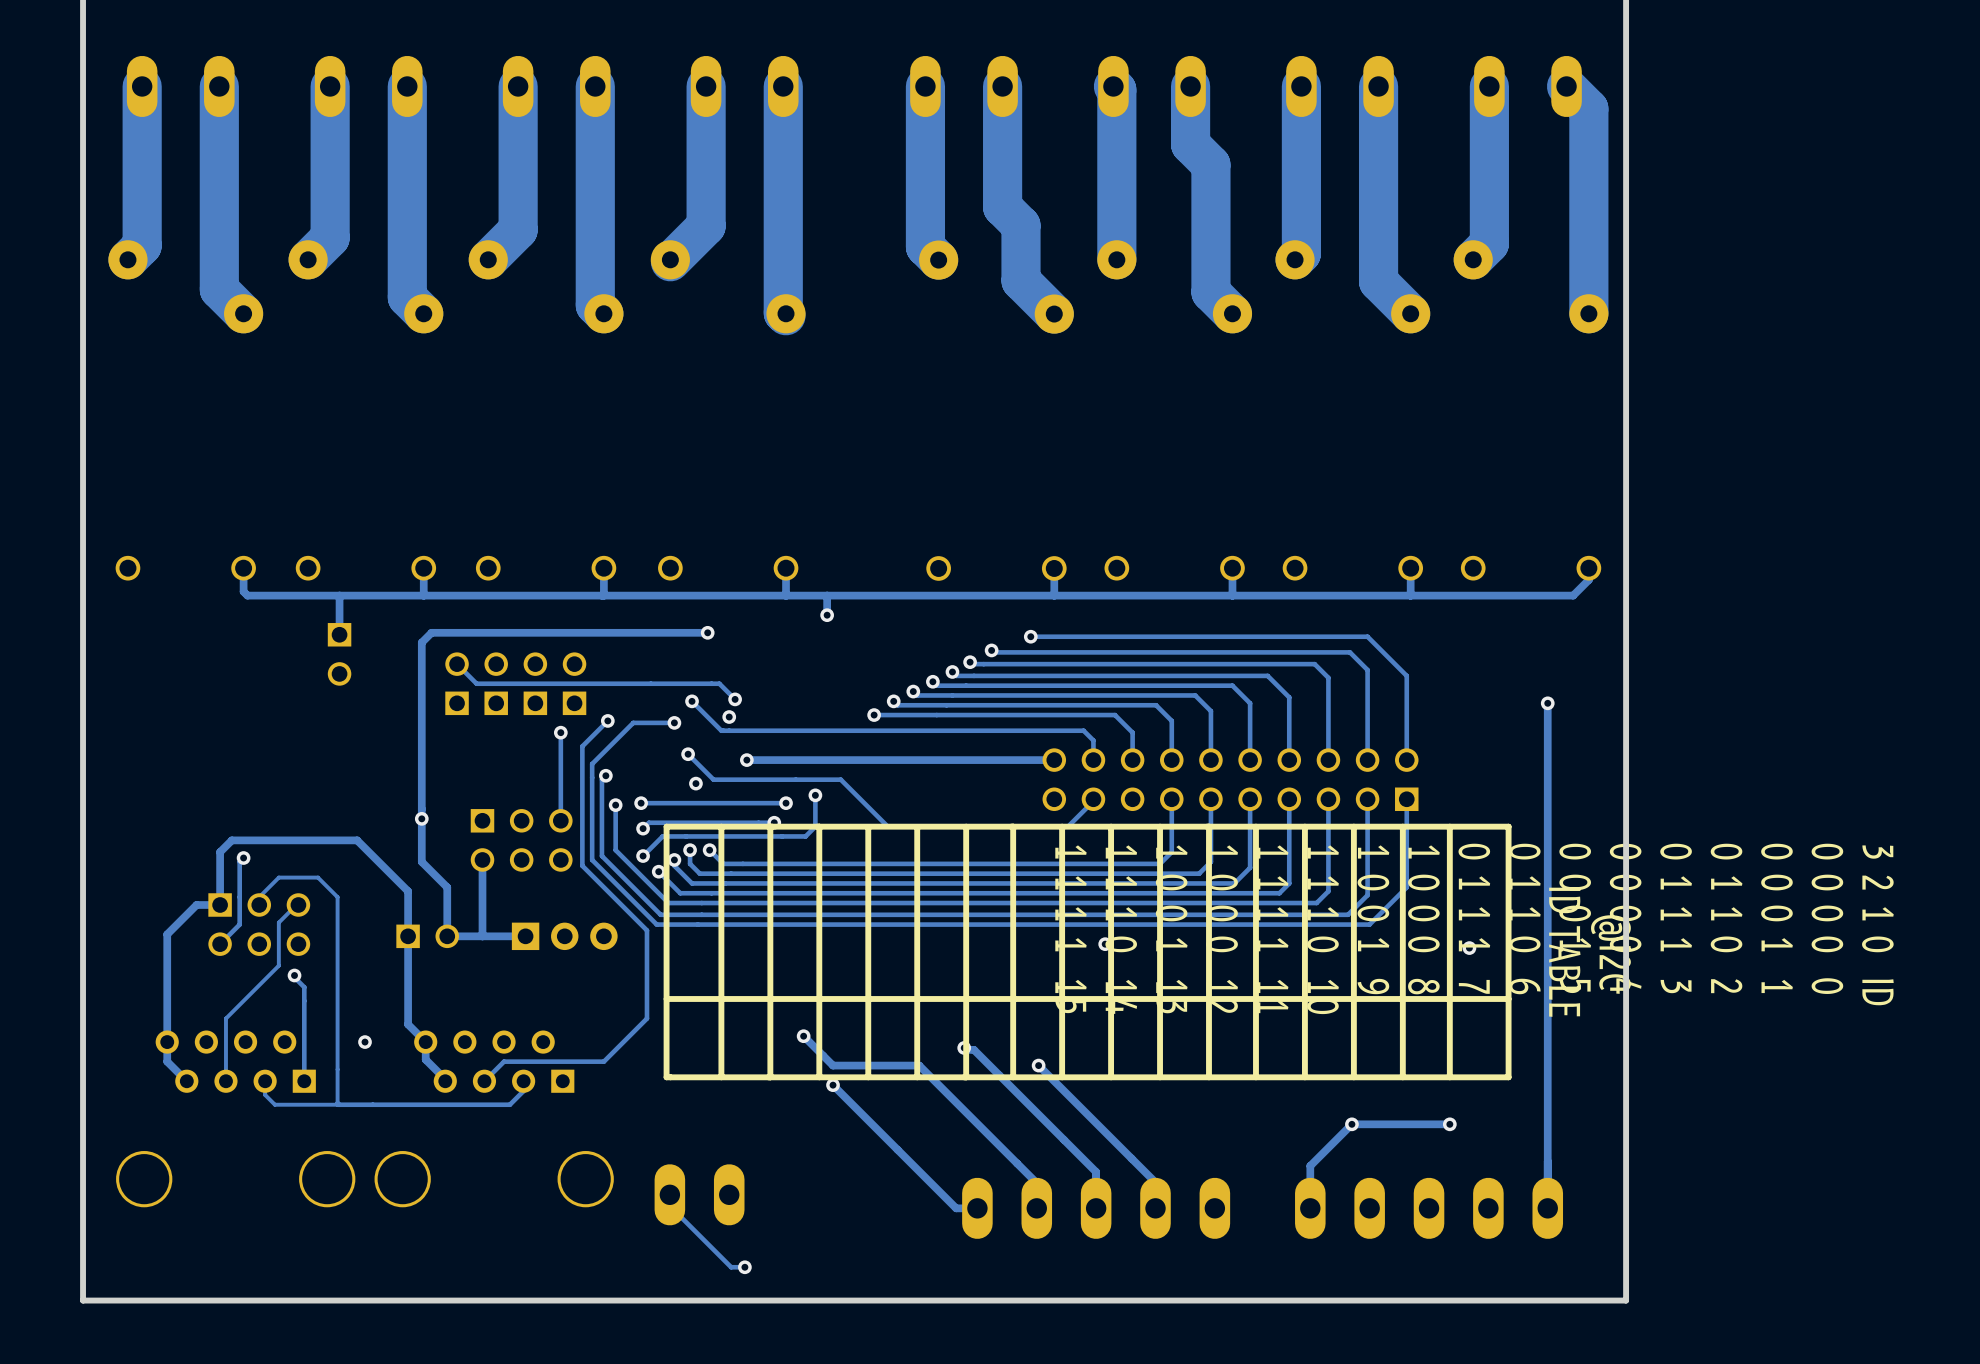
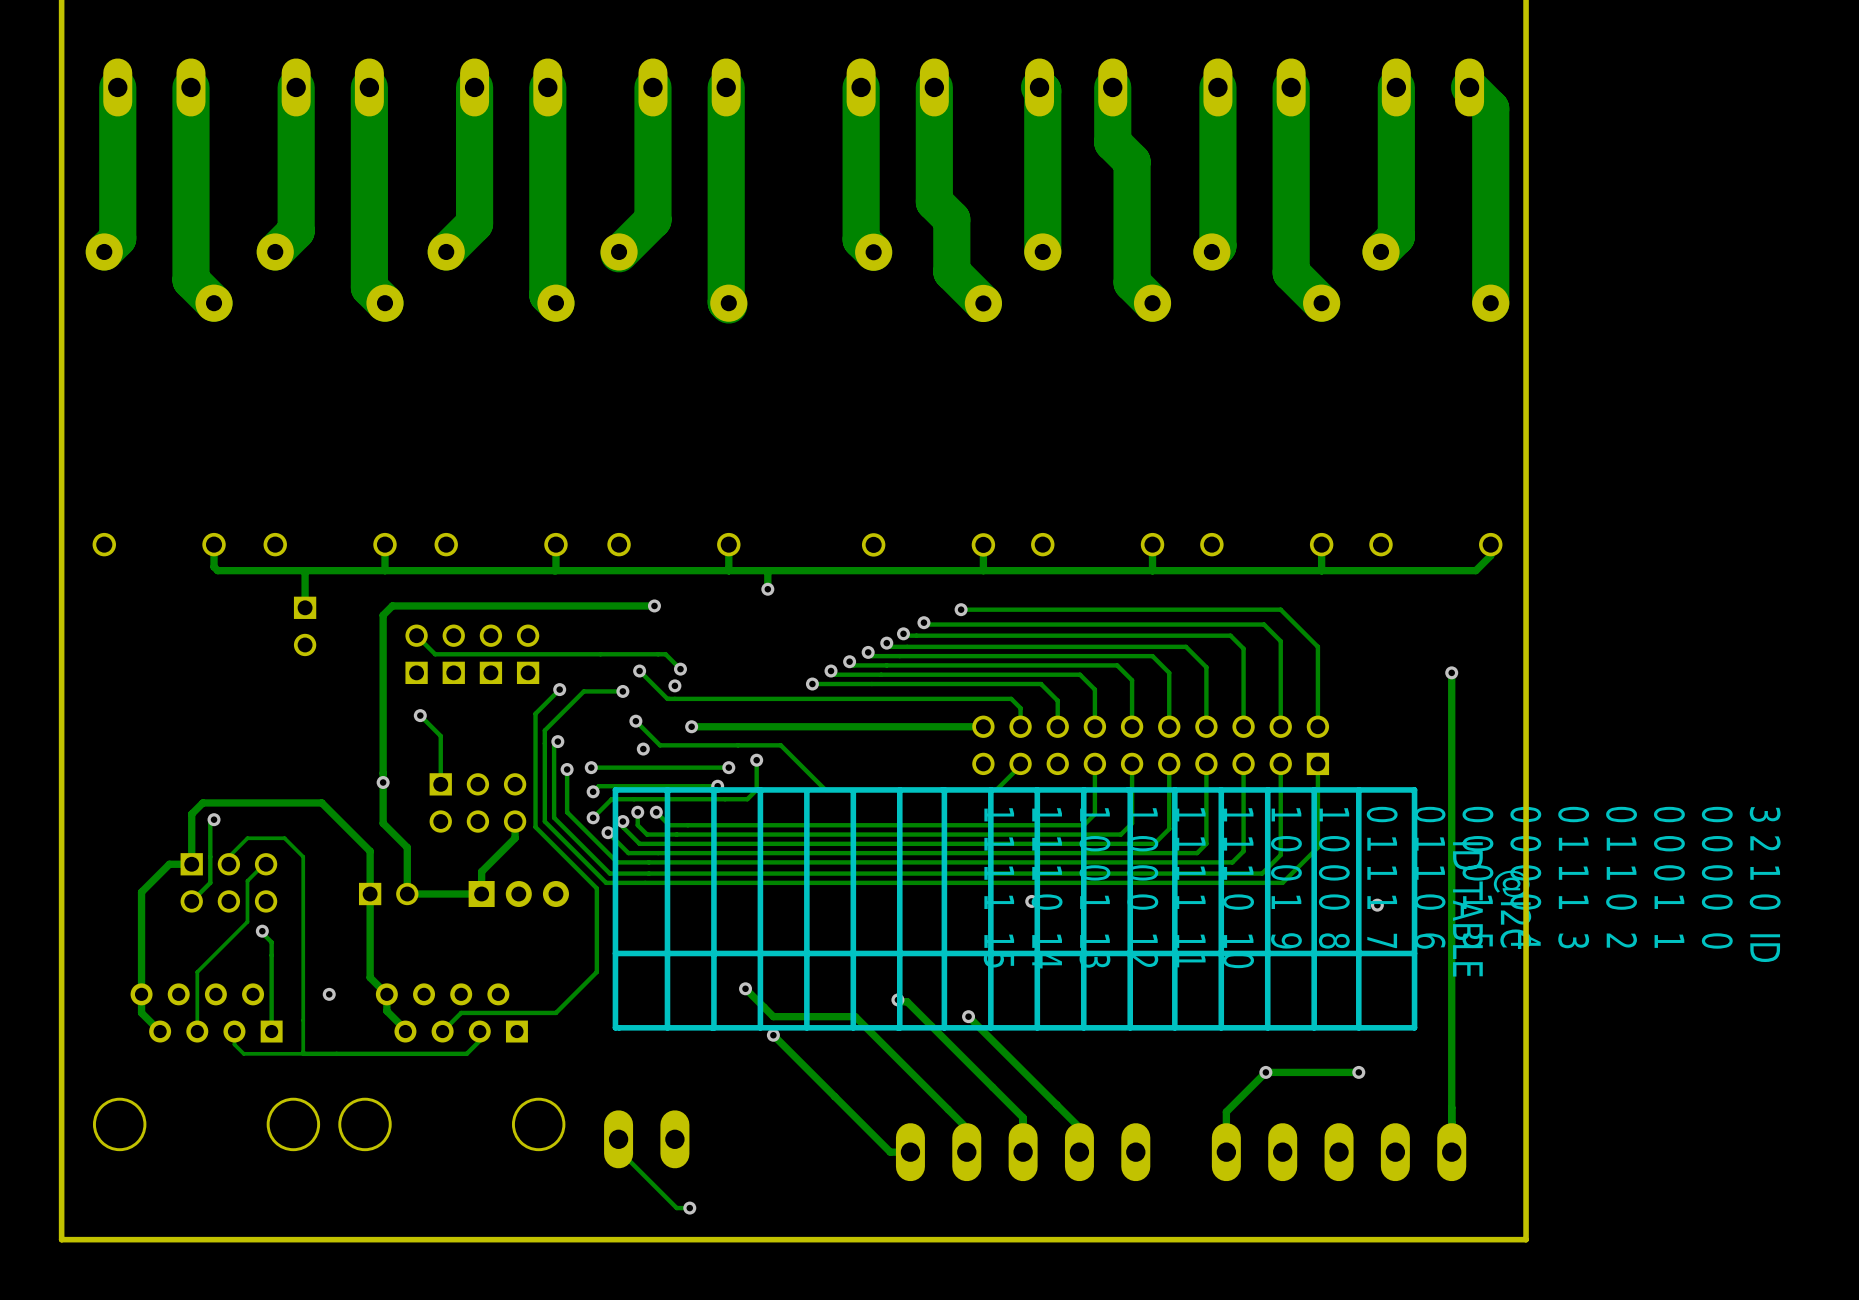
track: (560, 732) (560, 820) -> none
via: (560, 732) -> none
track: none -> (420, 715) (440, 736) (440, 784)
via: none -> (420, 715)
track: (482, 859) (482, 936) -> none
track: none -> (515, 821) (515, 838) (481, 871) (481, 894)

